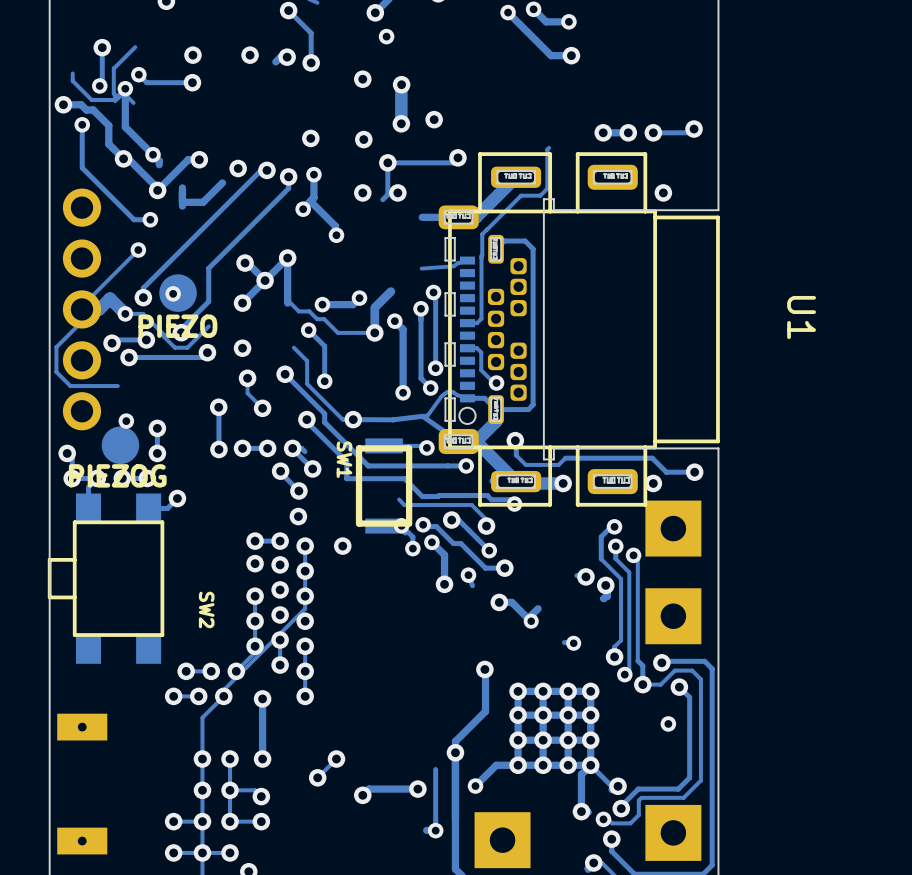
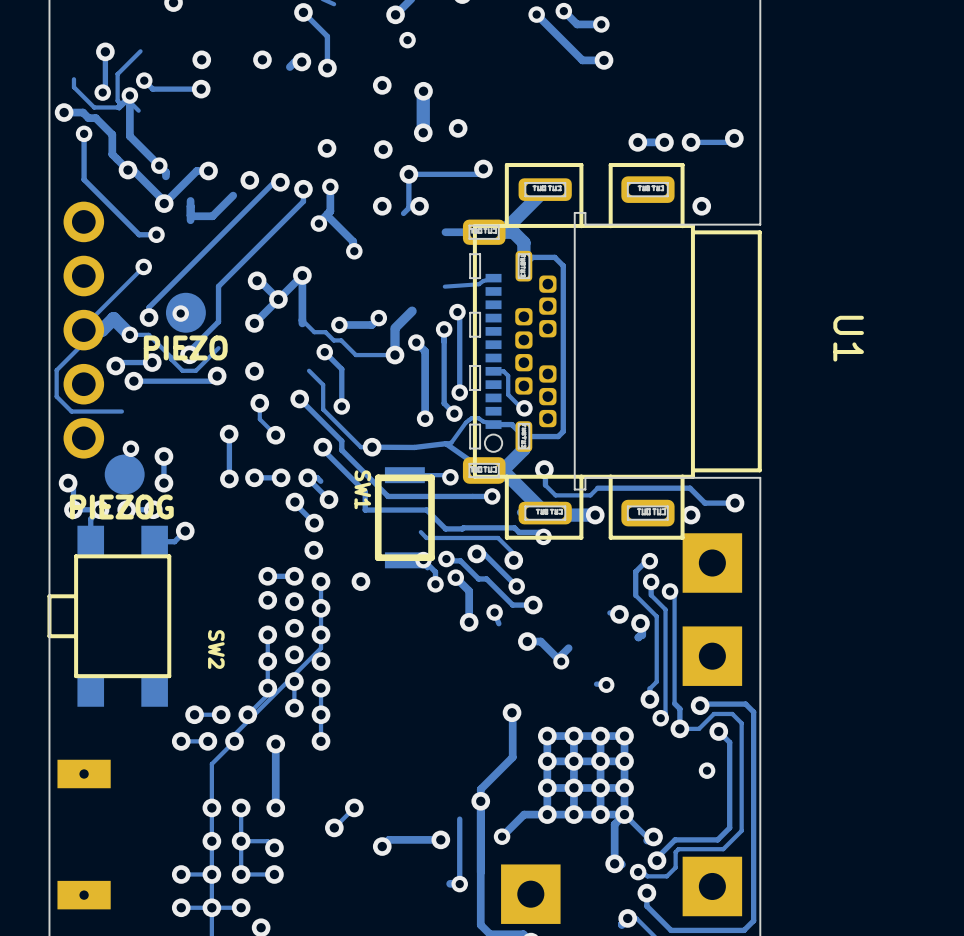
track: (549, 147) (547, 149) (547, 188) (540, 195) (521, 195) (482, 234) (481, 318) (477, 323) (467, 323) -> none
track: none -> (502, 232) (513, 232) (523, 242) (523, 266)

